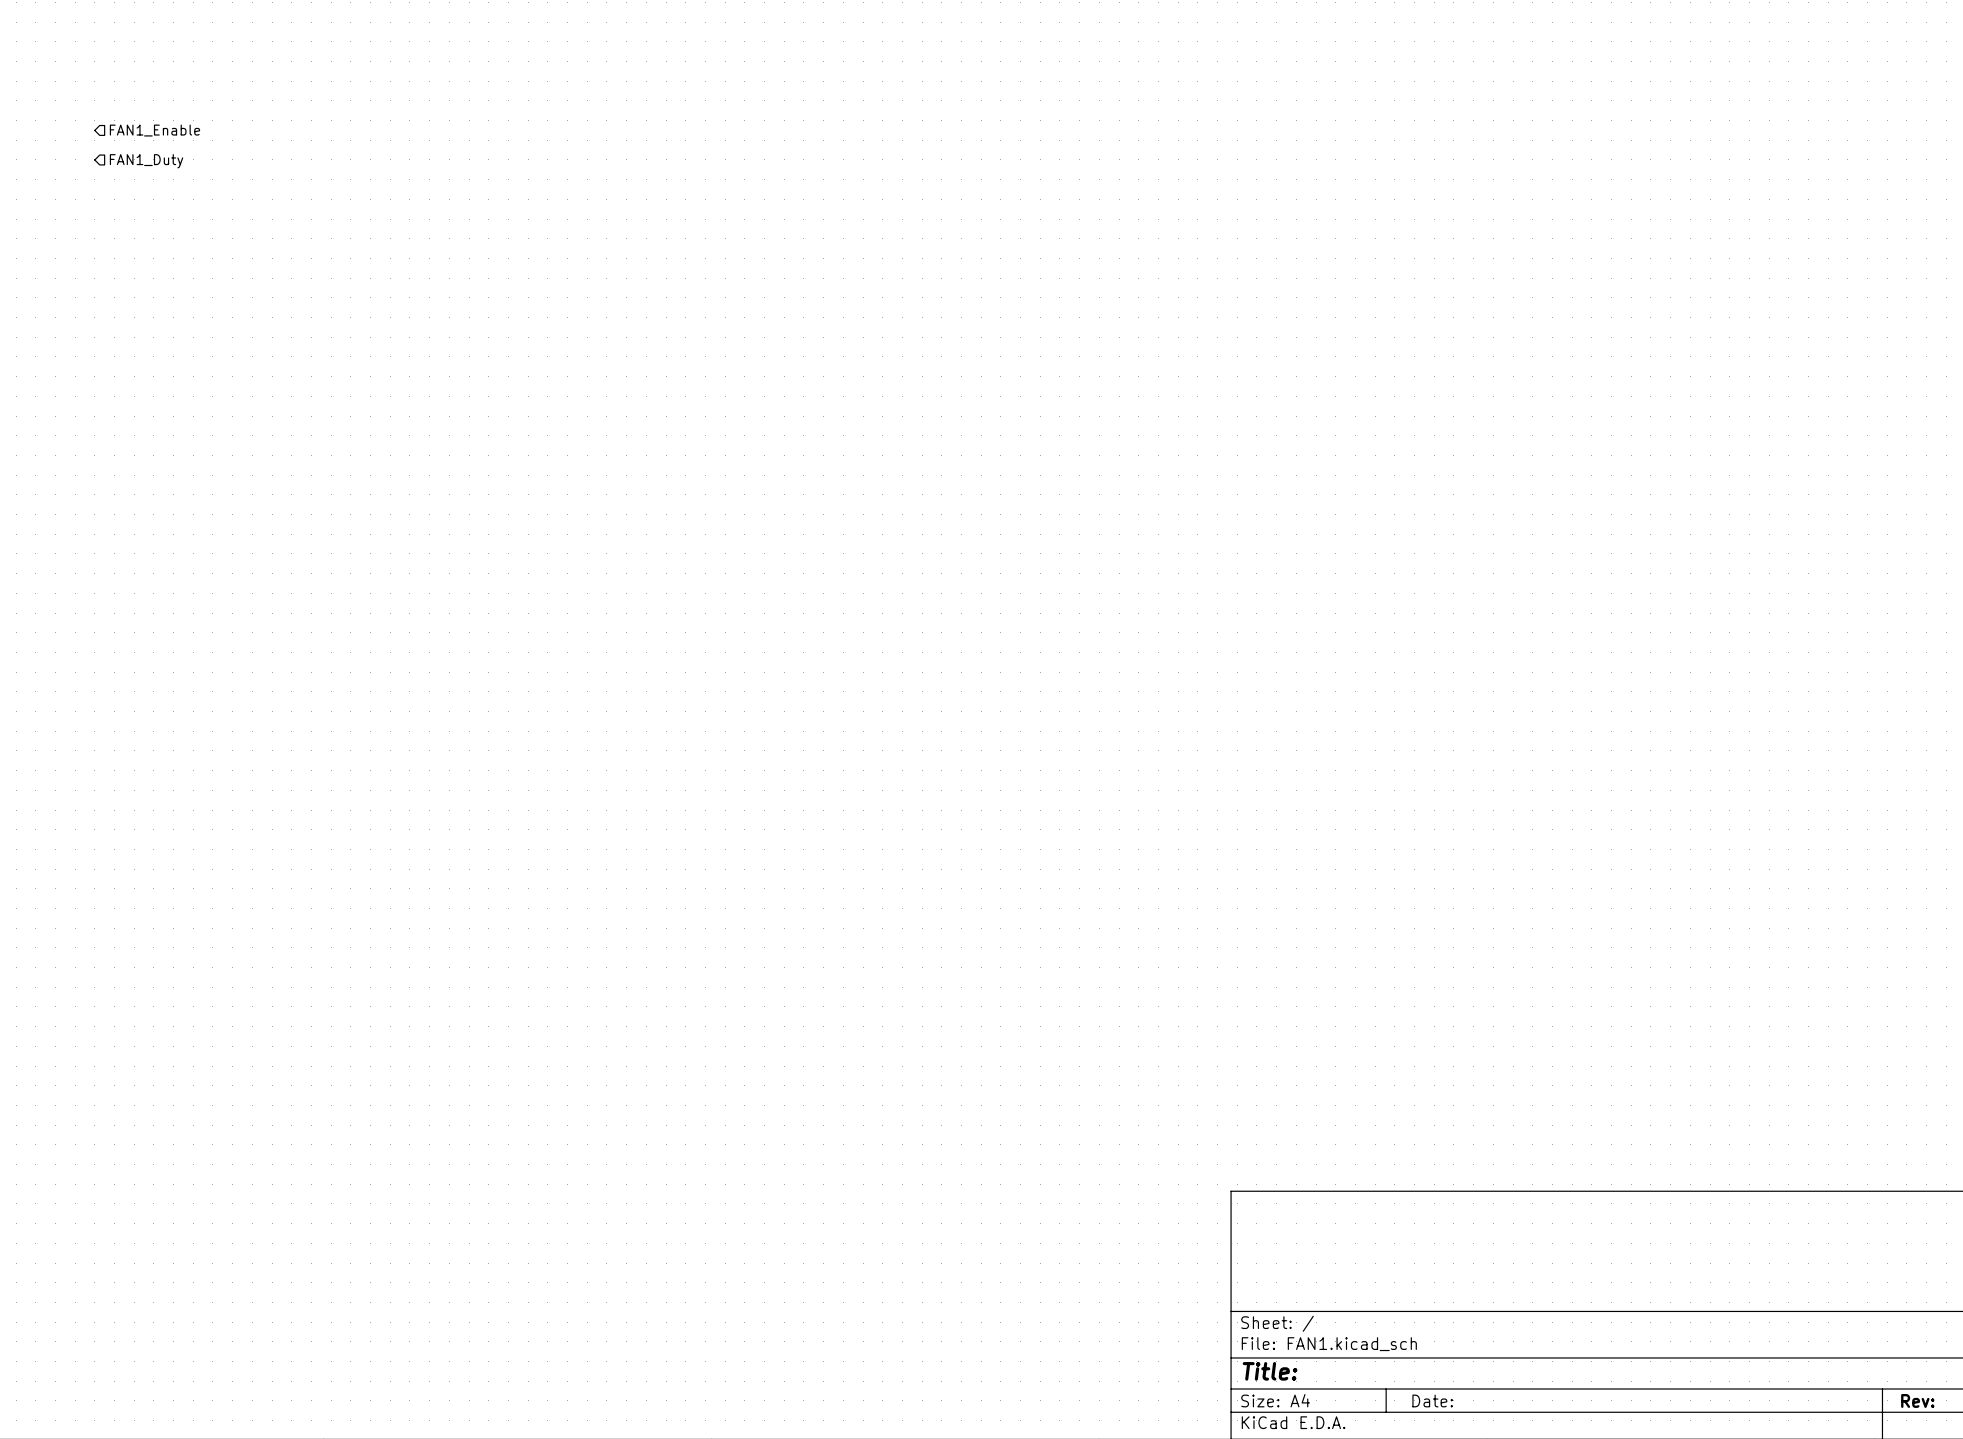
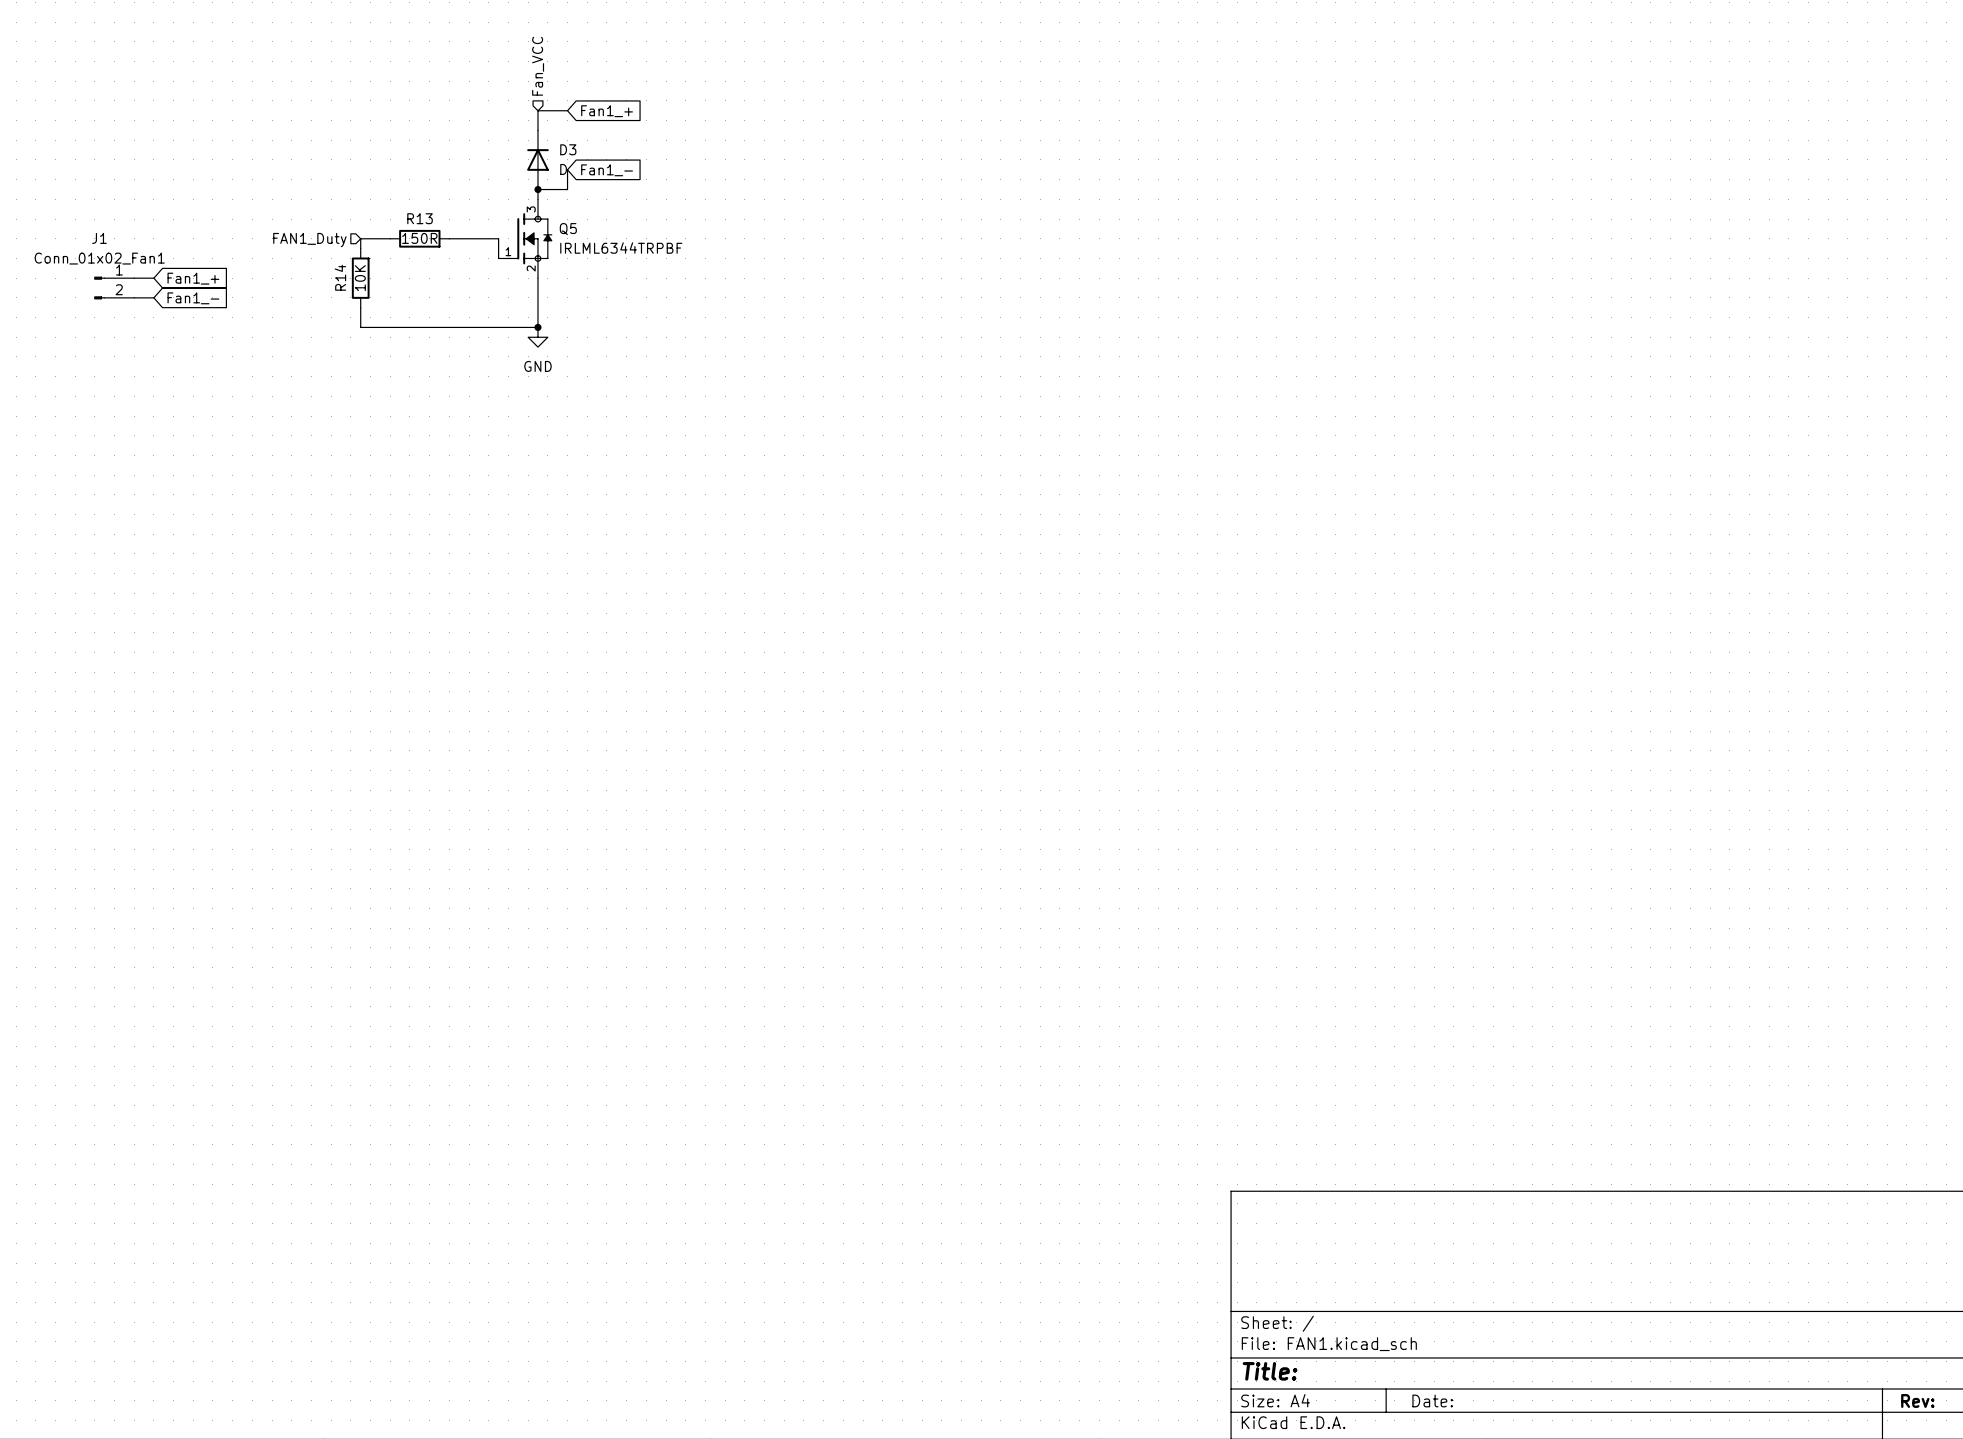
hierarchical label: none -> Fan_VCC (538, 66)
wire: none -> (567, 110) (537, 110) (537, 130)
global label: none -> Fan1_+ (607, 111)
hierarchical label: FAN1_Enable (154, 130) -> none
D3: none -> D (537, 159)
hierarchical label: FAN1_Duty (146, 161) -> none
wire: none -> (567, 169) (567, 189) (537, 189) (537, 199)
global label: none -> Fan1_- (607, 170)
junction: none -> (537, 189)
wire: none -> (390, 238) (360, 238) (360, 248)
R13: none -> 150R (419, 238)
wire: none -> (449, 238) (498, 238) (498, 258)
Q5: none -> IRLML6344TRPBF (525, 238)
hierarchical label: none -> FAN1_Duty (309, 240)
wire: none -> (134, 278) (153, 278)
global label: none -> Fan1_+ (193, 278)
R14: none -> 10K (360, 278)
wire: none -> (537, 278) (537, 327) (360, 327) (360, 307)
J1: none -> Conn_01x02_Fan1 (114, 288)
wire: none -> (134, 297) (153, 297)
global label: none -> Fan1_- (193, 298)
junction: none -> (537, 327)
power symbol: none -> GND (537, 337)

